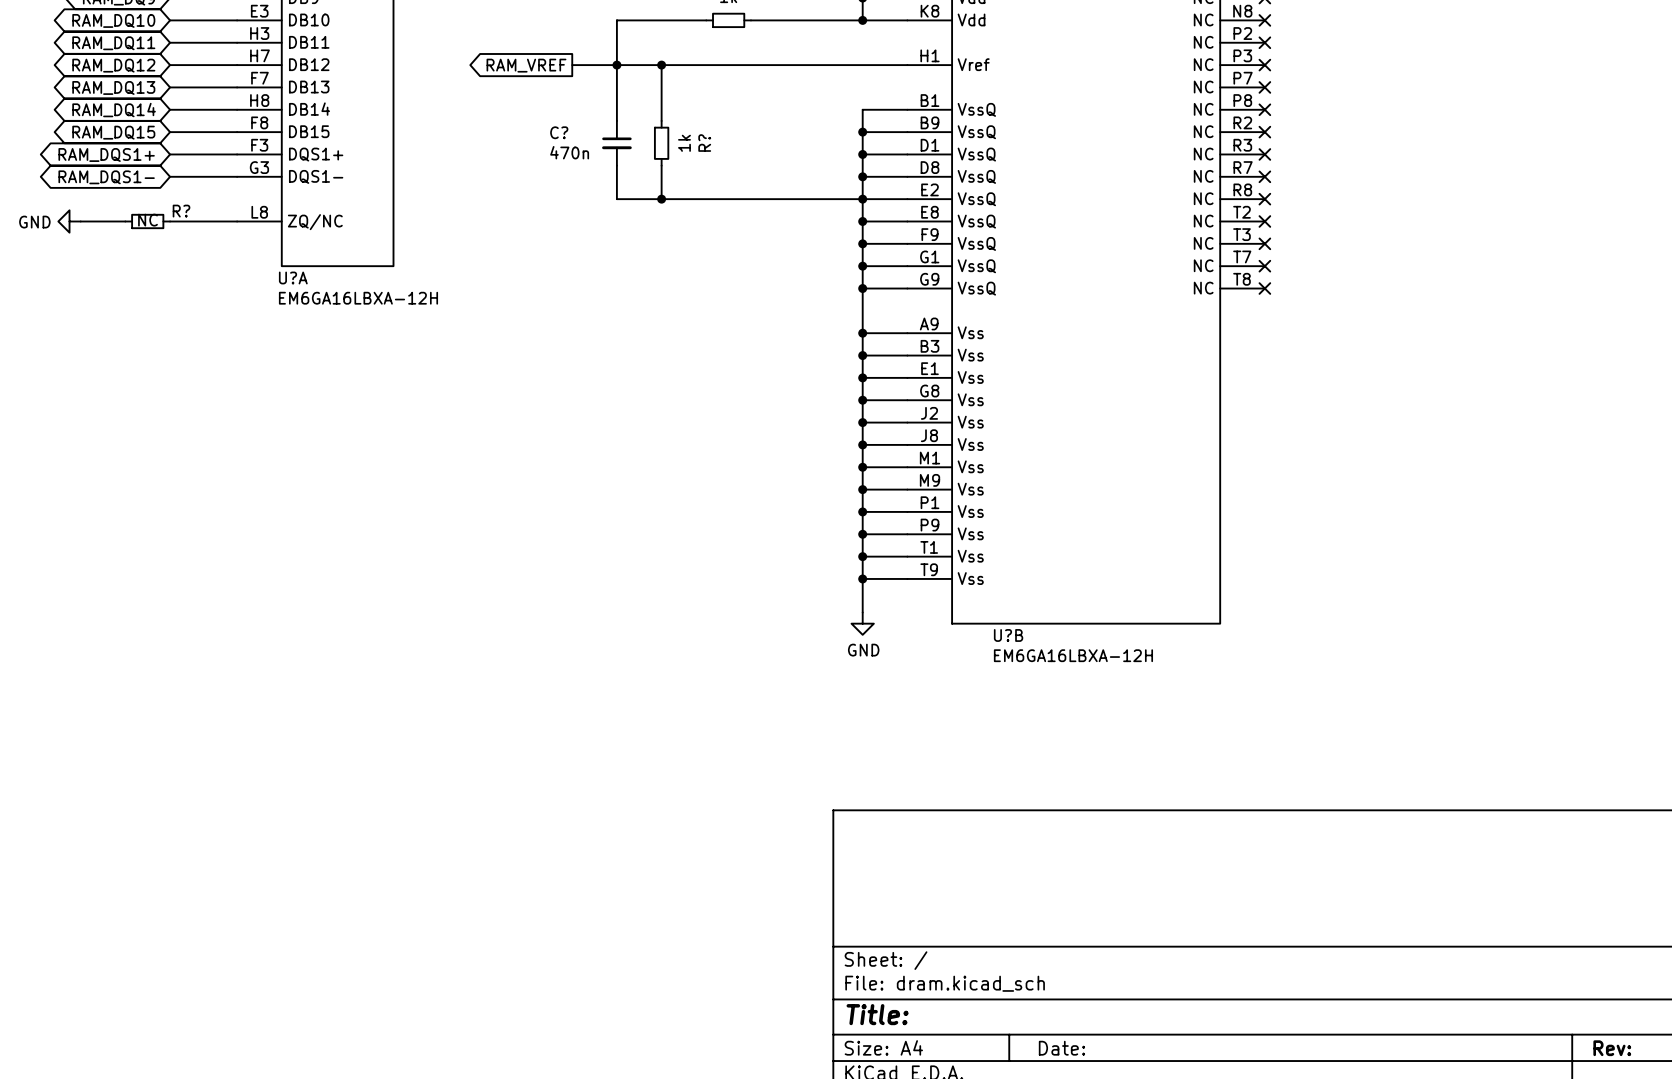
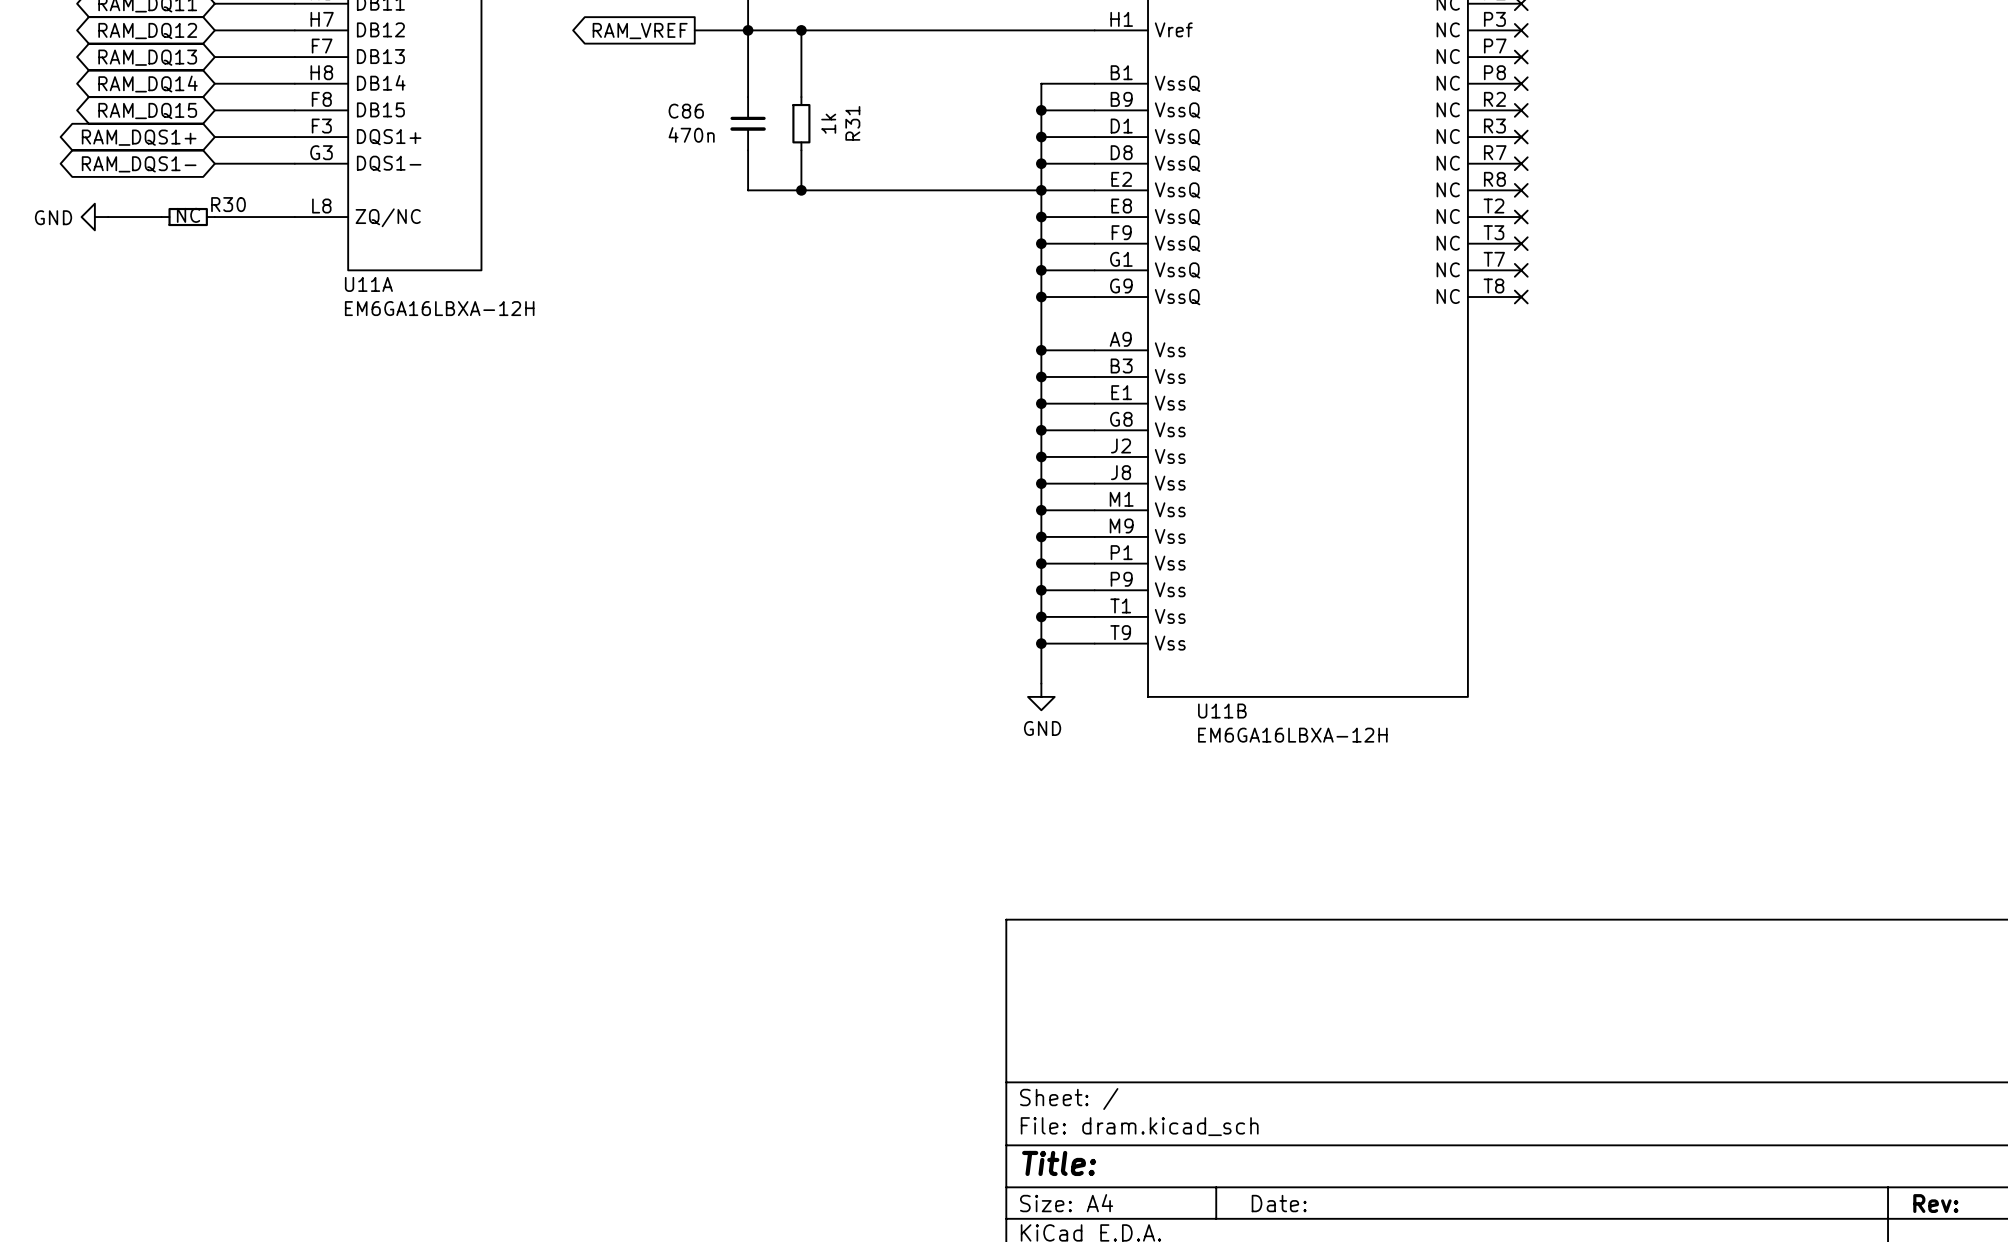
C? name: C? (559, 132) -> C86 (686, 111)
R? name: R? (704, 143) -> R31 (852, 123)
R? name: R? (181, 211) -> R30 (228, 204)
U?A name: U?A (293, 277) -> U11A (368, 284)
U?B name: U?B (1008, 635) -> U11B (1222, 711)

